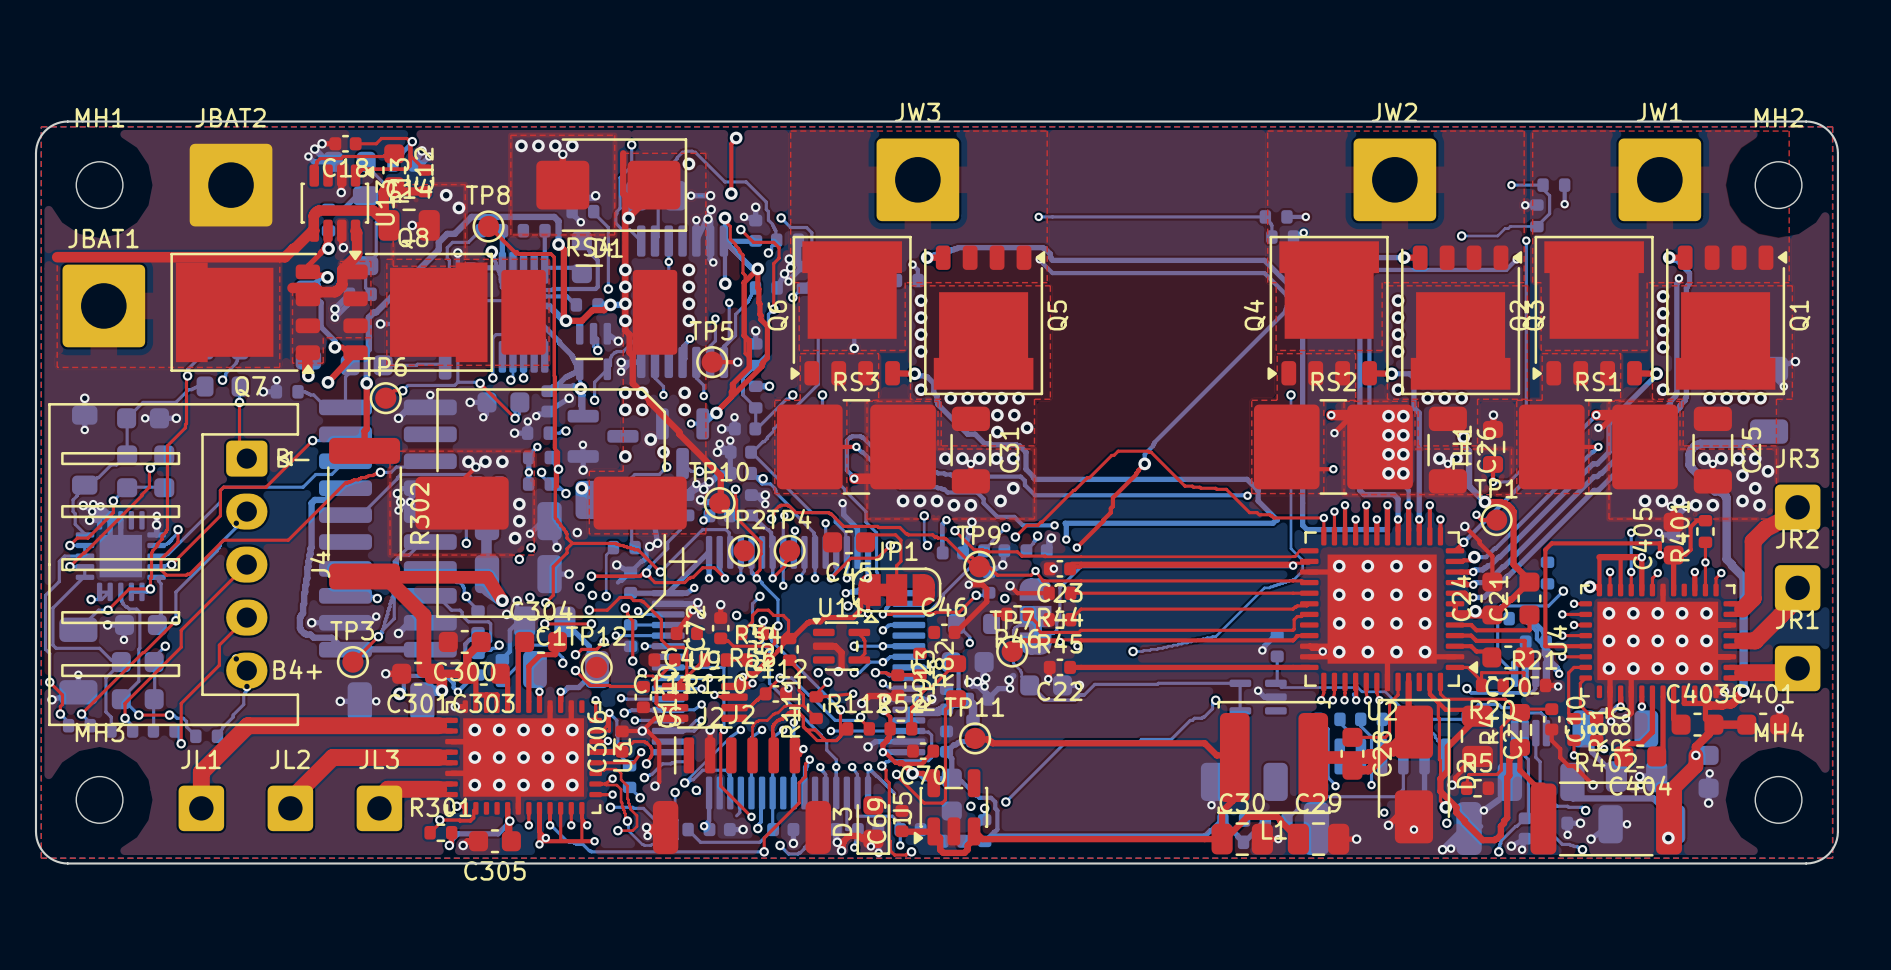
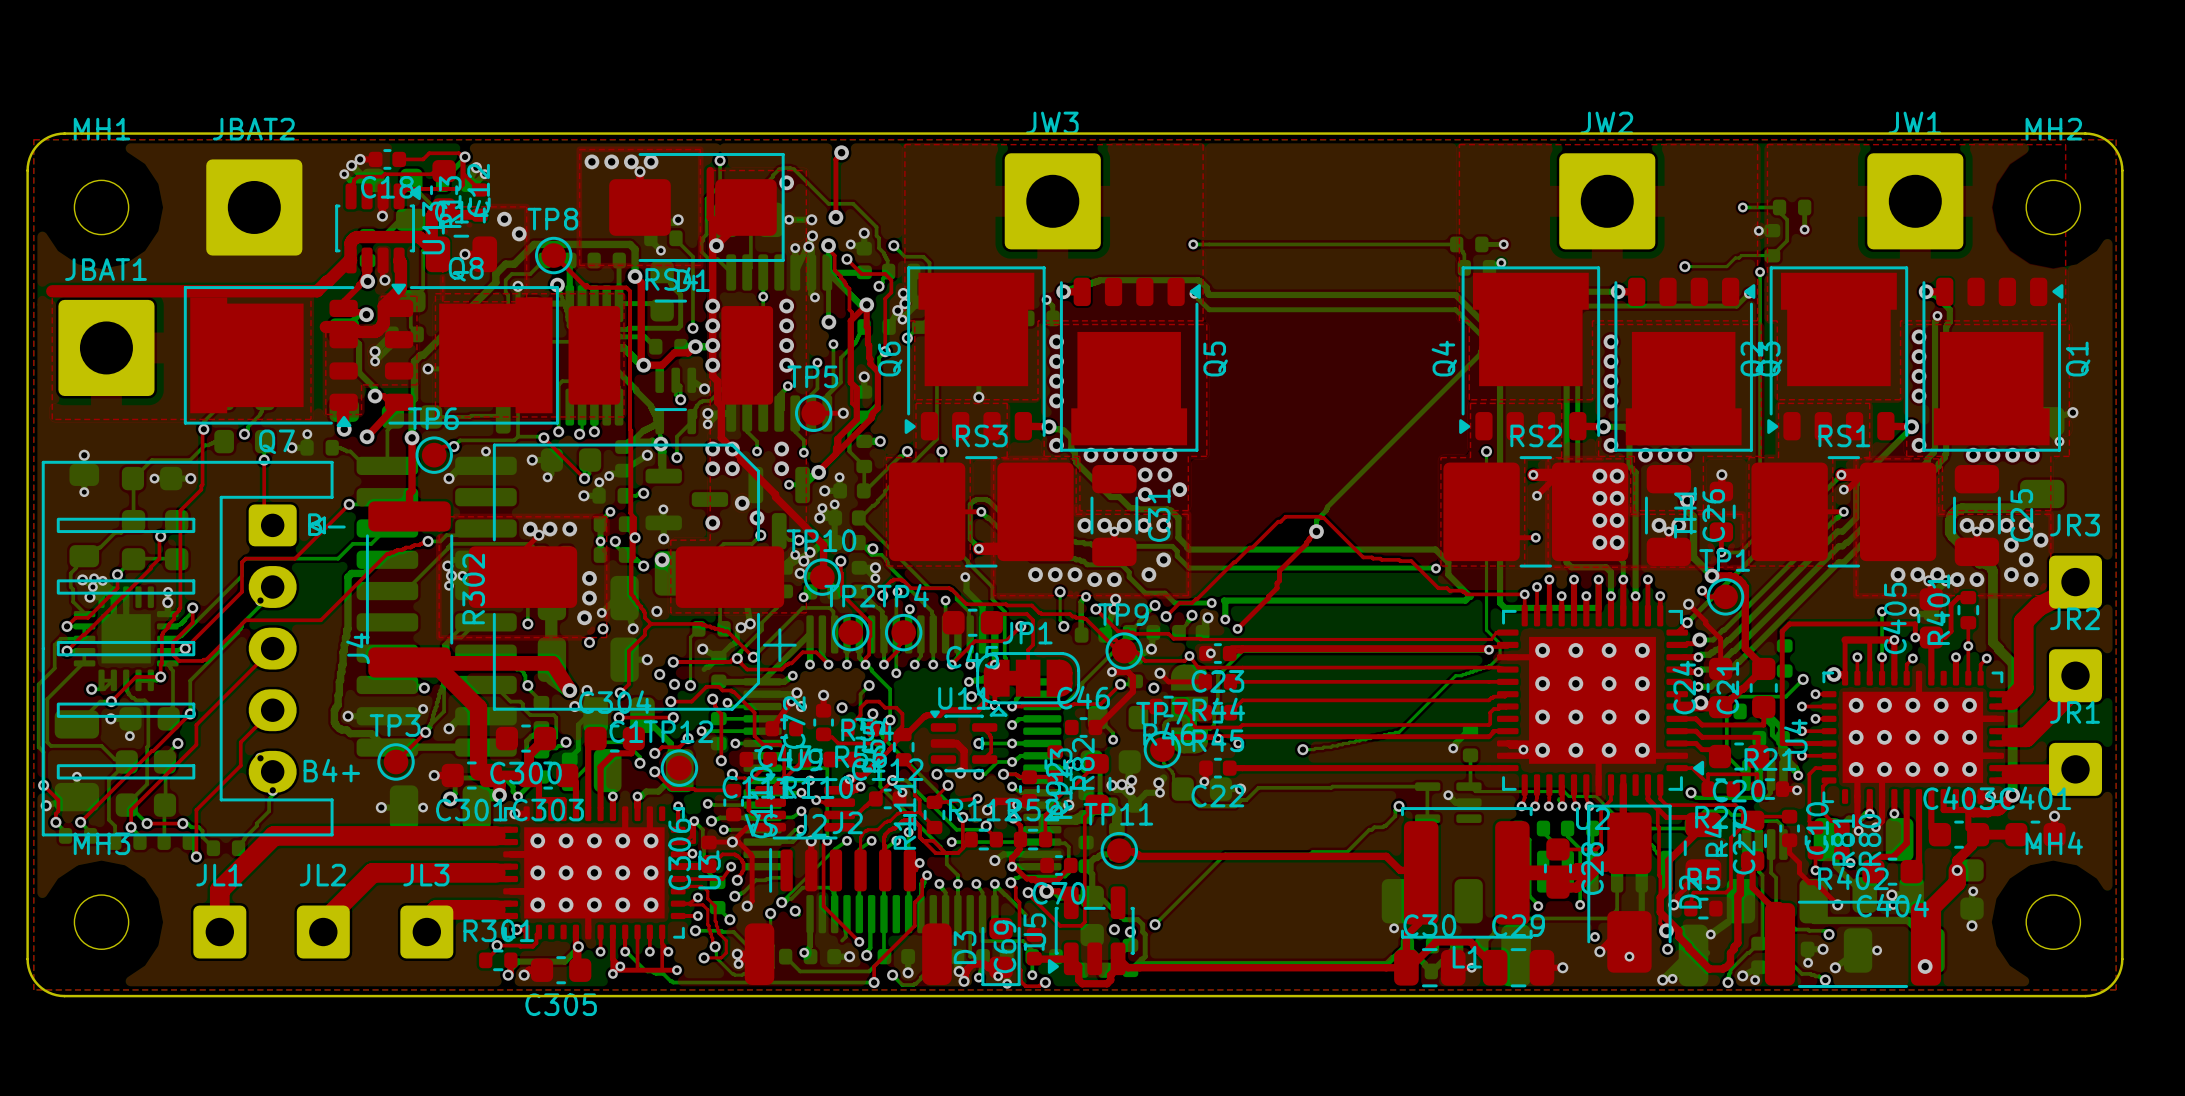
via: (529, 597) -> none

